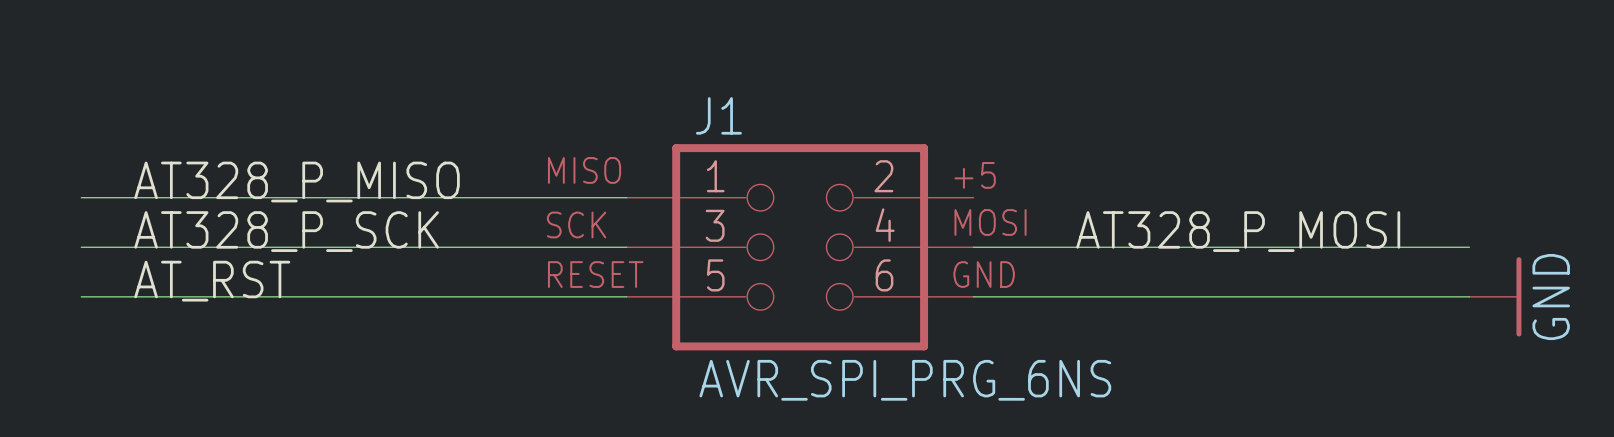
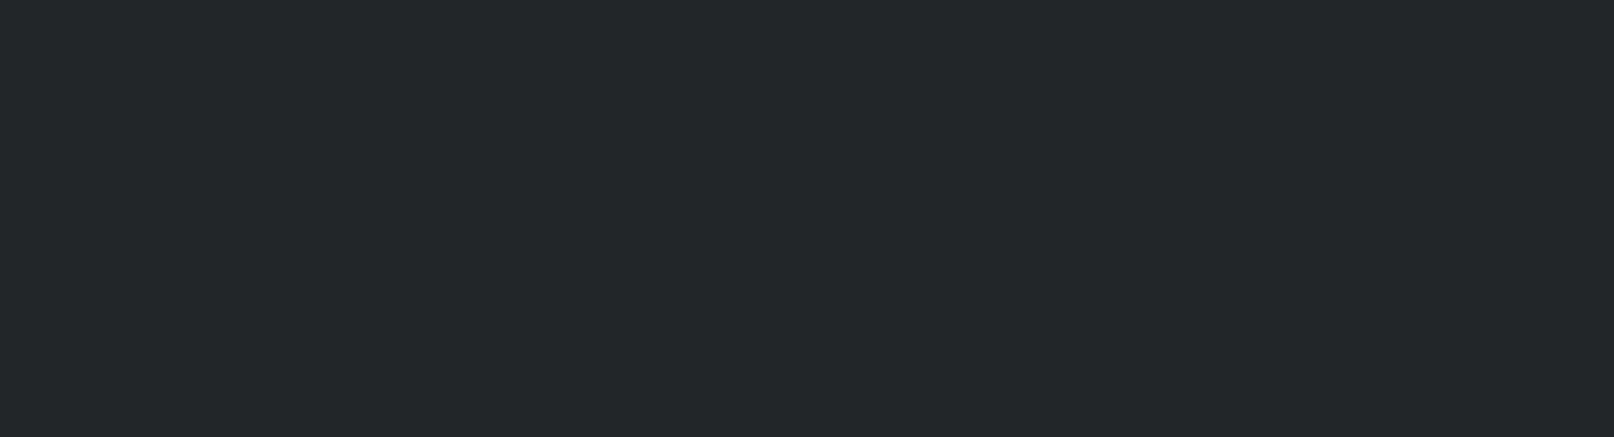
label: AT328_P_MISO (297, 182) -> none
wire: (81, 197) (626, 197) -> none
label: AT328_P_SCK (286, 231) -> none
label: AT328_P_MOSI (1238, 231) -> none
wire: (81, 247) (626, 247) -> none
J1: AVR_SPI_PRG_6NS (800, 247) -> none
wire: (973, 247) (1469, 247) -> none
label: AT_RST (212, 281) -> none
wire: (81, 296) (626, 296) -> none
wire: (973, 296) (1469, 296) -> none
power symbol: GND (1495, 296) -> none

